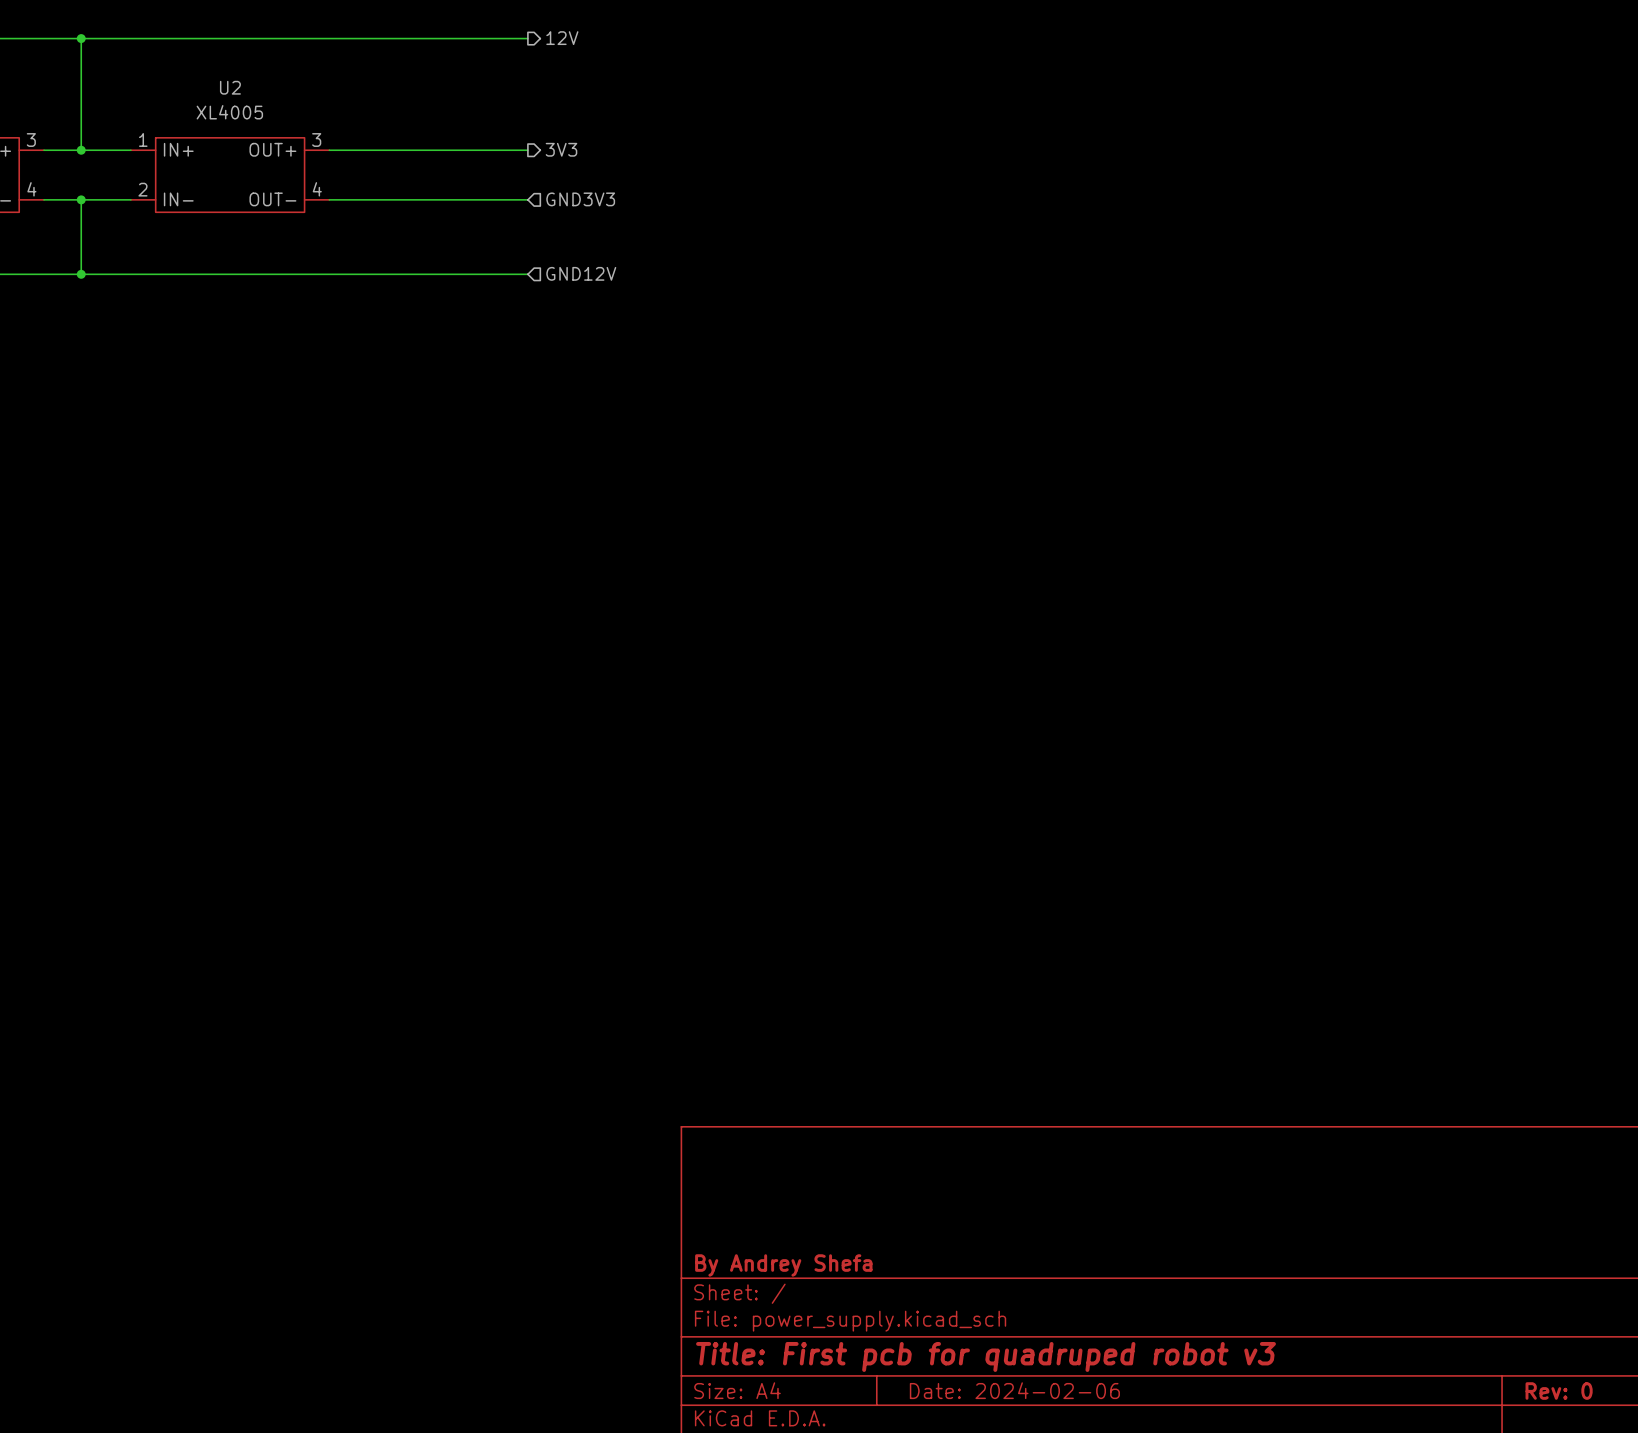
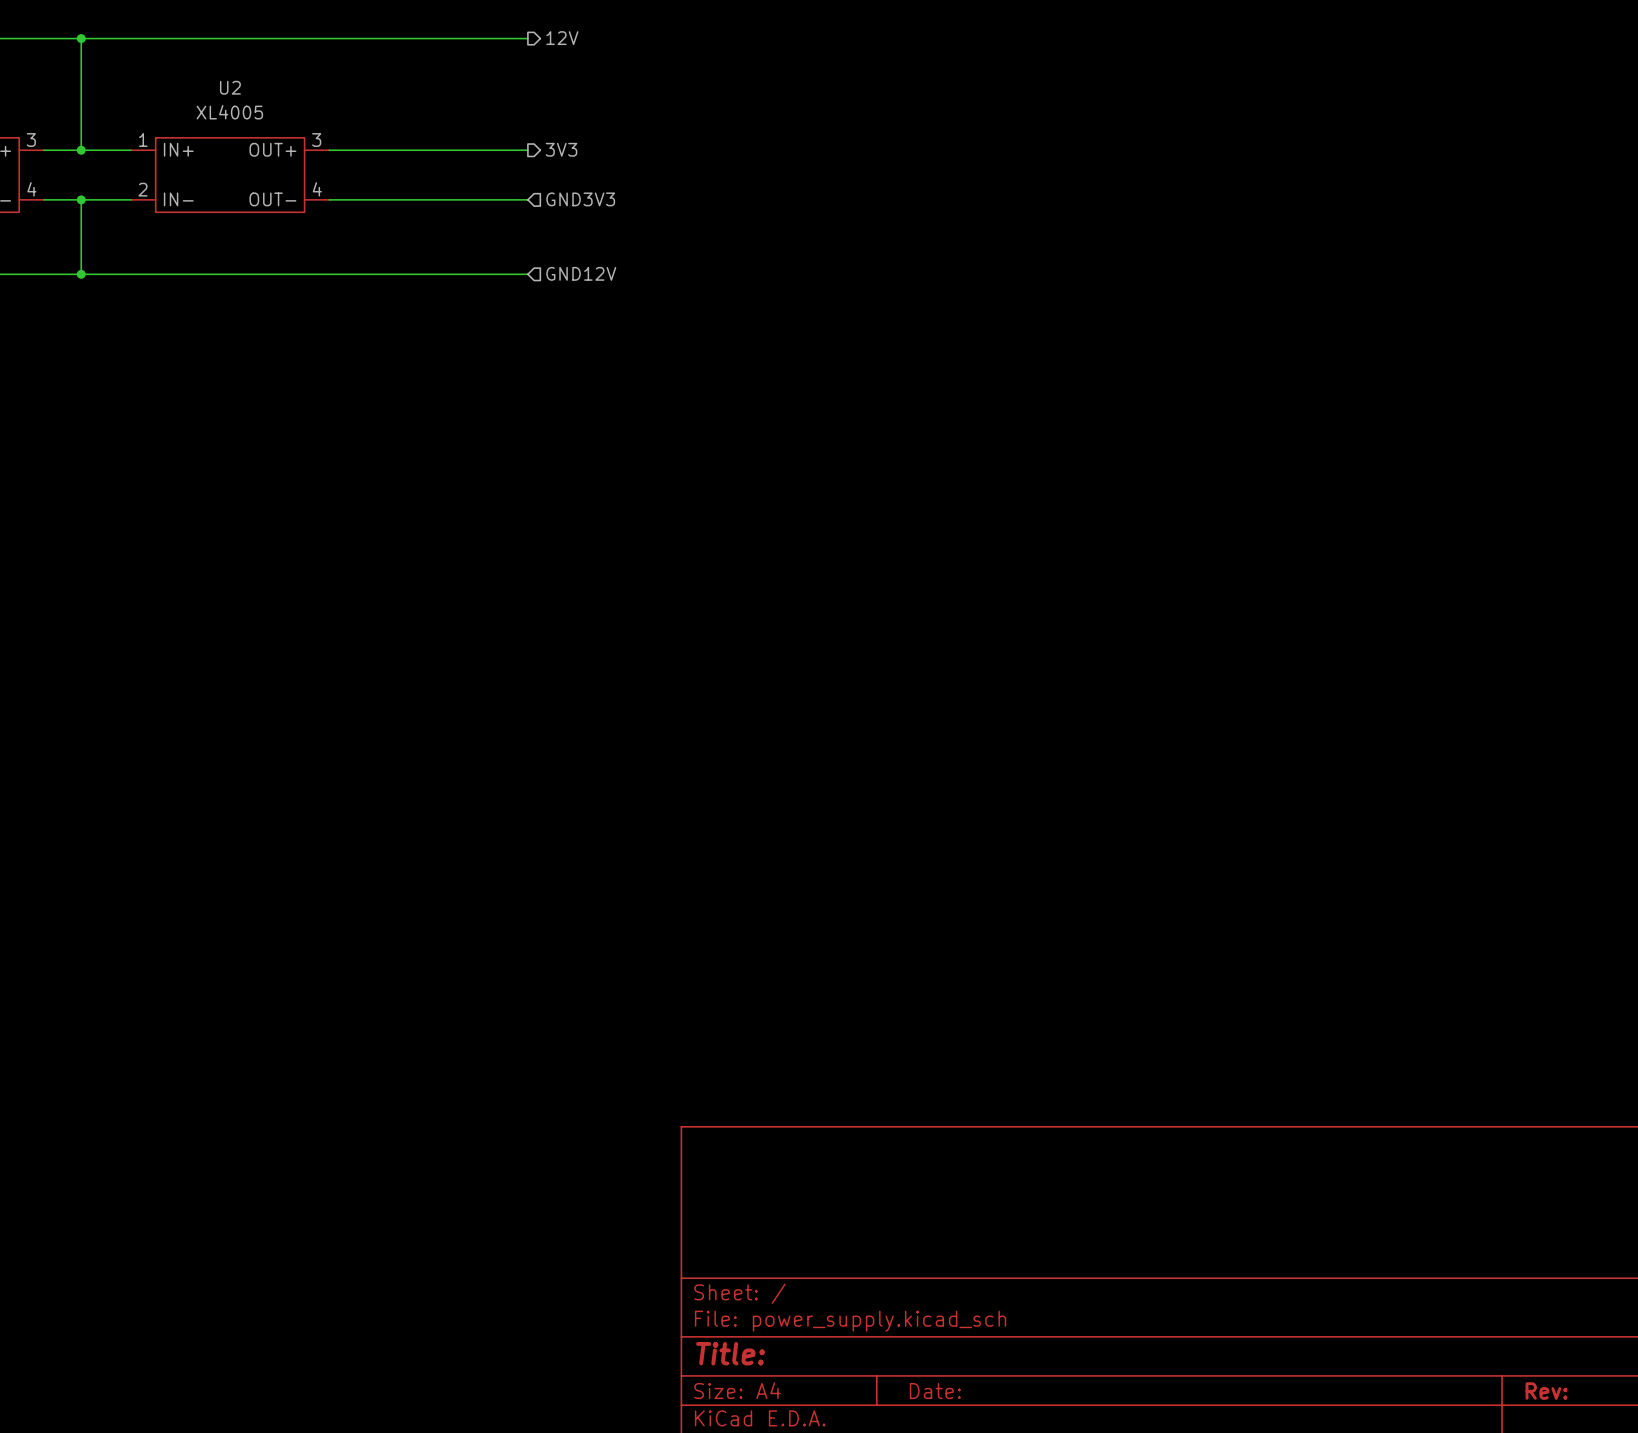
title block: By Andrey Shefa (783, 1265) -> none
title block: Title: First pcb for quadruped robot v3 (986, 1356) -> Title: (730, 1353)
title block: Date: 2024-02-06 (1014, 1390) -> Date: (935, 1391)
title block: Rev: 0 (1559, 1391) -> Rev: (1546, 1391)

